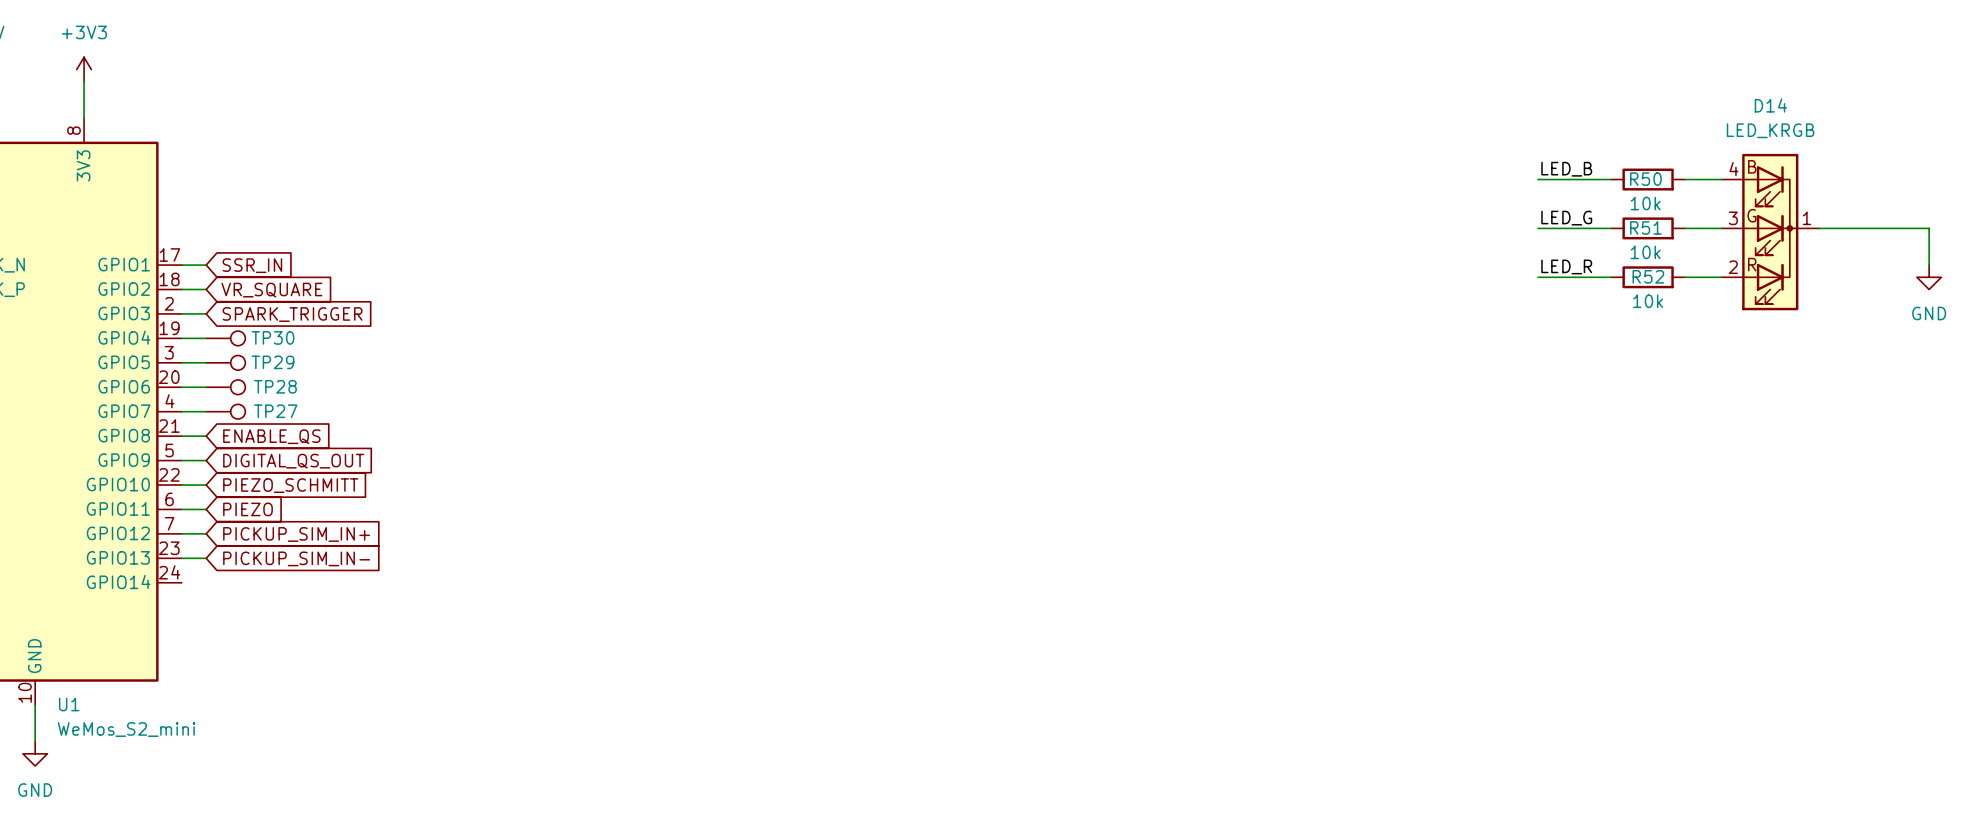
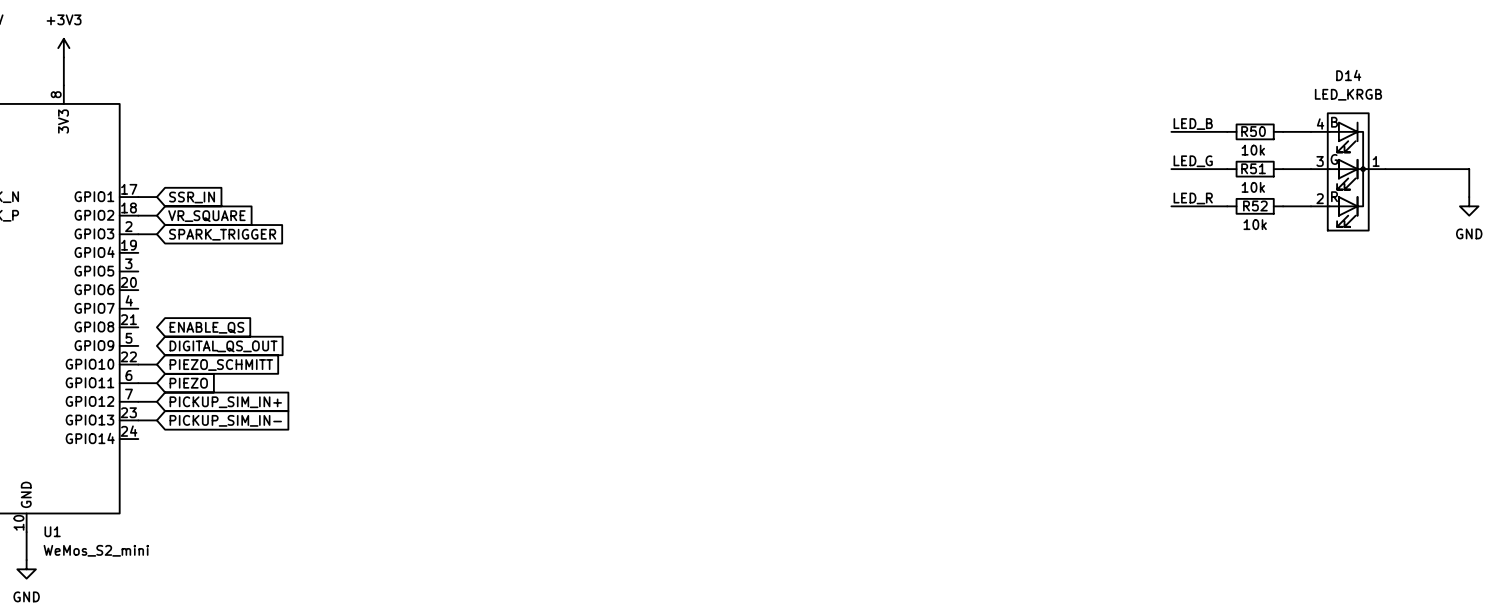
wire: (181, 338) (206, 338) -> none
TP30: (225, 338) -> none
wire: (181, 362) (206, 362) -> none
TP29: (225, 362) -> none
wire: (181, 387) (206, 387) -> none
TP28: (225, 387) -> none
wire: (181, 411) (206, 411) -> none
TP27: (225, 411) -> none
wire: (181, 436) (206, 436) -> none
wire: (181, 460) (206, 460) -> none

